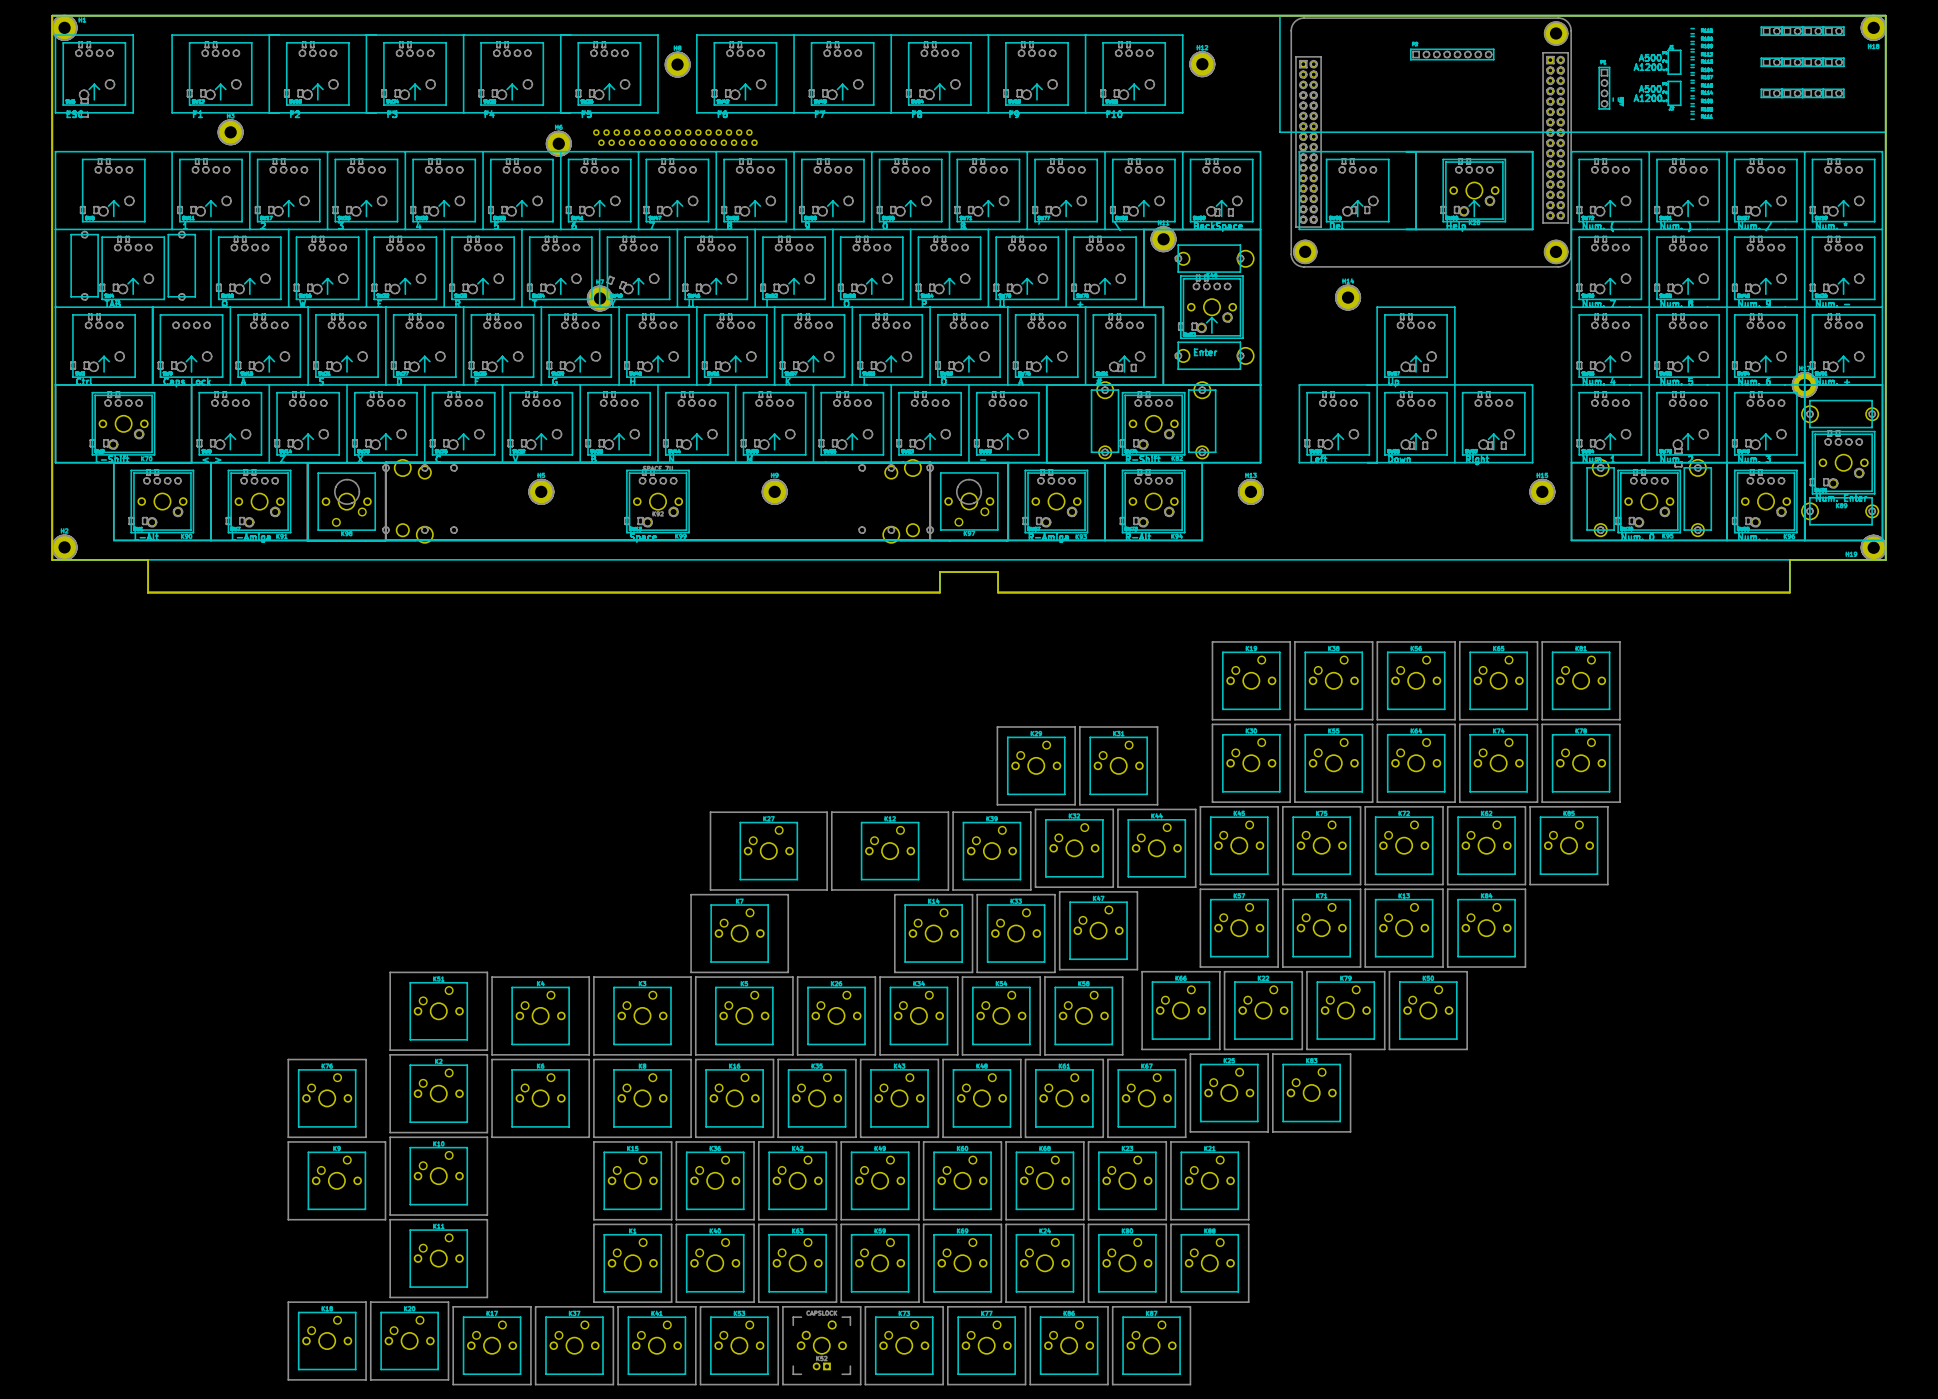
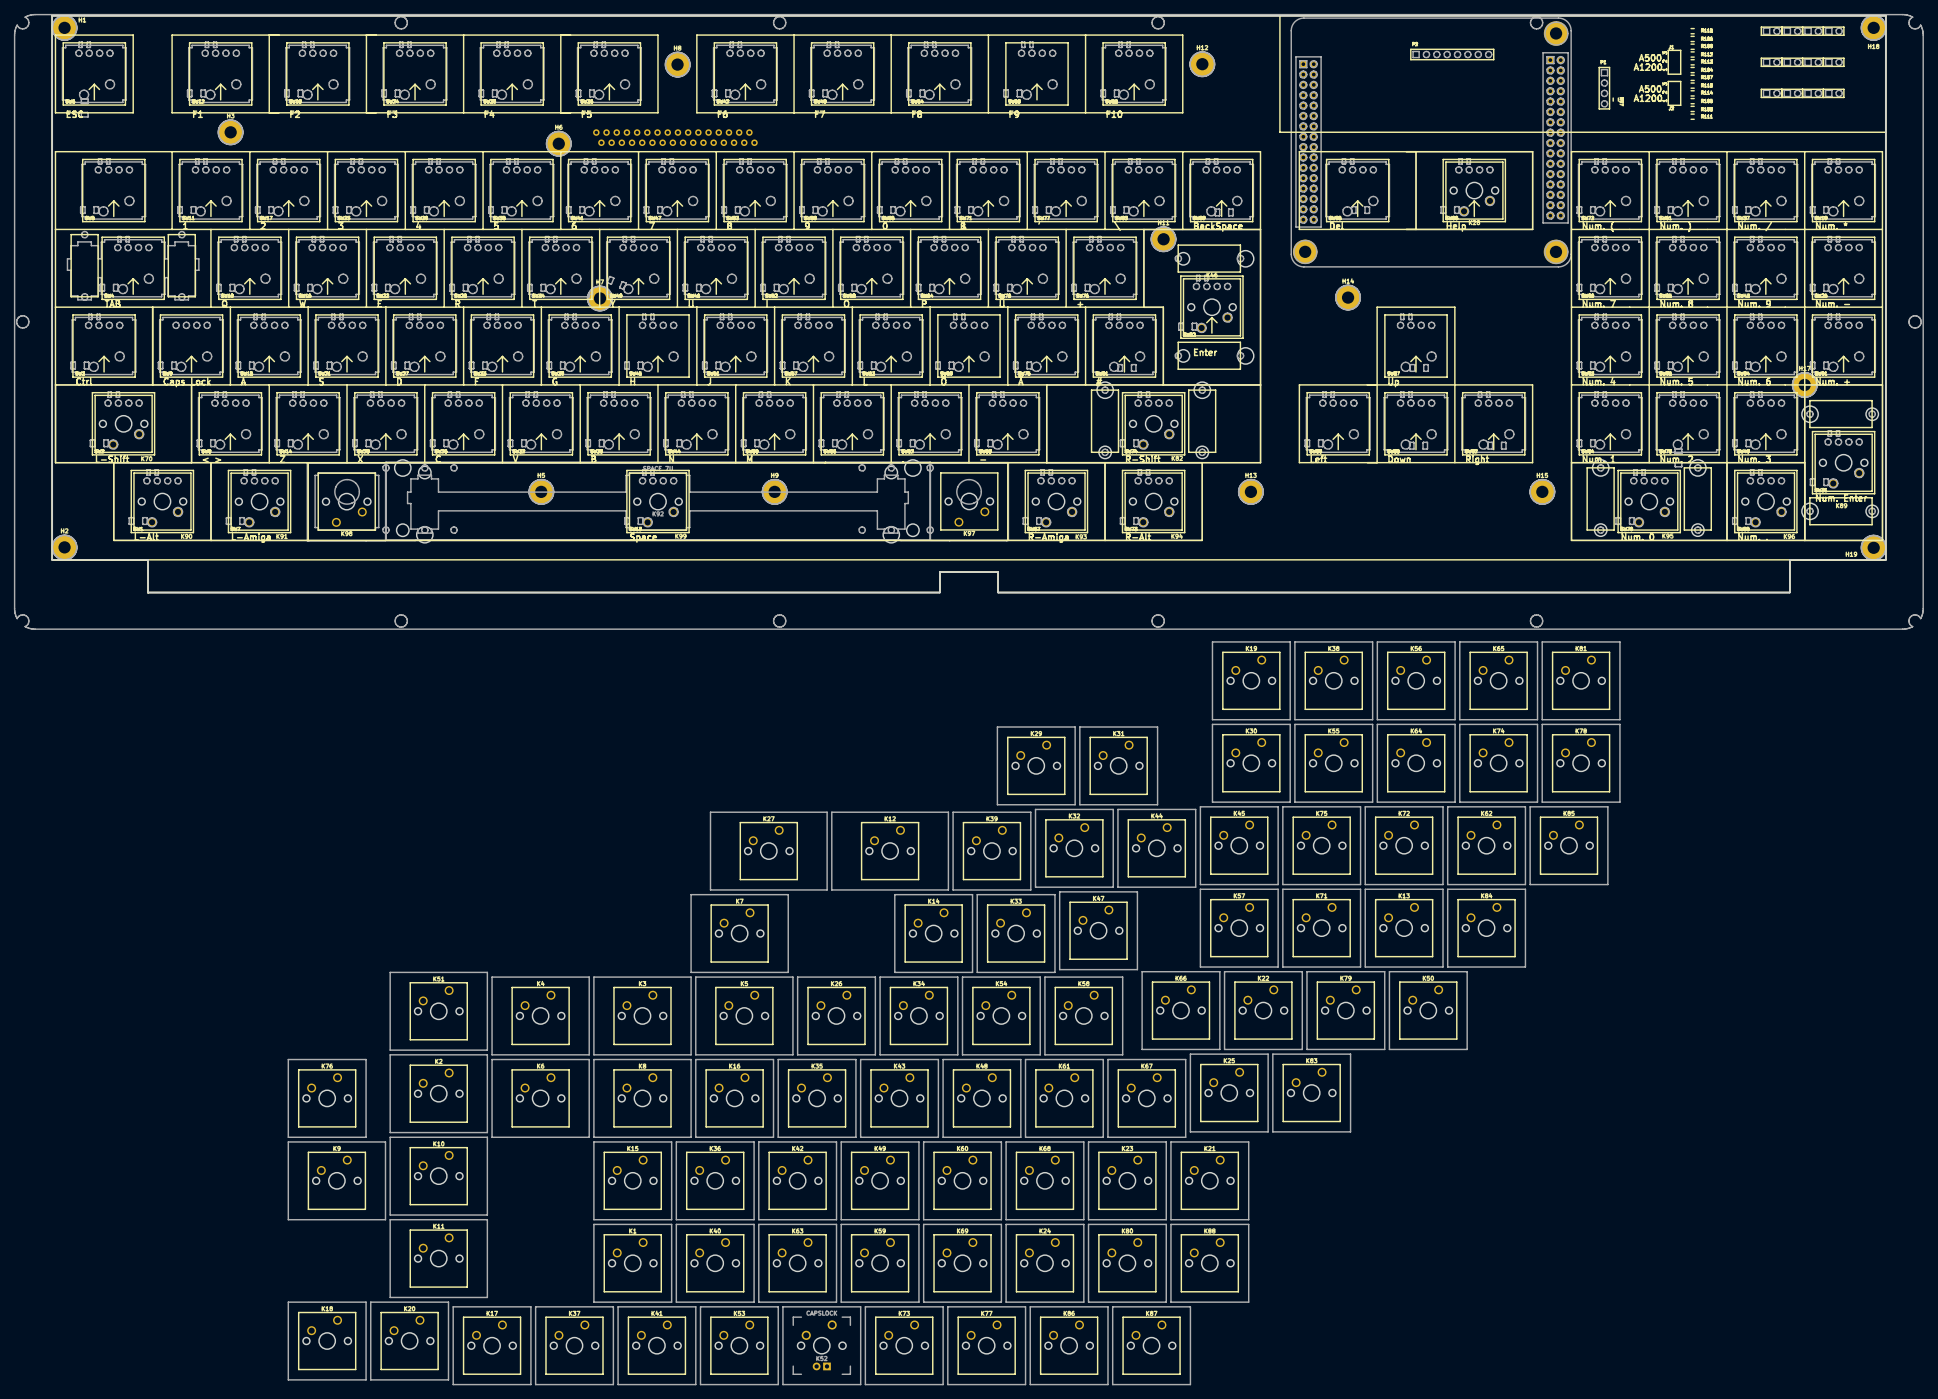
line: none -> (35, 14) (1909, 15) (1912, 17) (1909, 20) (1910, 26) (1915, 28) (1920, 25) (1923, 35) (1922, 615) (1920, 618) (1916, 615) (1911, 616) (1908, 621) (1912, 626) (1902, 629) (28, 628) (25, 626) (28, 622) (27, 617) (22, 614) (17, 618) (14, 608) (14, 35) (17, 25) (20, 28) (26, 27) (28, 22) (25, 17) (35, 14)
line: none -> (401, 16) (396, 19) (395, 22) (397, 27) (401, 28) (404, 27) (407, 22) (406, 19) (401, 16)
line: none -> (779, 16) (783, 17) (785, 22) (783, 27) (779, 28) (776, 27) (773, 22) (776, 17) (779, 16)
line: none -> (1158, 16) (1161, 17) (1164, 22) (1161, 27) (1158, 28) (1154, 27) (1152, 22) (1154, 17) (1158, 16)
line: none -> (1536, 16) (1540, 17) (1542, 22) (1540, 27) (1536, 28) (1531, 26) (1530, 22) (1531, 19) (1536, 16)
line: none -> (65, 45) (122, 45) (122, 47) (126, 47) (126, 100) (122, 100) (122, 102) (65, 102) (65, 100) (62, 100) (62, 47) (65, 47) (65, 45)
line: none -> (192, 45) (249, 45) (249, 47) (252, 47) (252, 100) (249, 100) (249, 102) (192, 102) (192, 100) (188, 100) (188, 47) (192, 47) (192, 45)
line: none -> (289, 45) (346, 45) (346, 47) (349, 47) (349, 100) (346, 100) (346, 102) (289, 102) (289, 100) (285, 100) (285, 47) (289, 47) (289, 45)
line: none -> (386, 45) (443, 45) (443, 47) (446, 47) (446, 100) (443, 100) (443, 102) (386, 102) (386, 100) (383, 100) (383, 47) (386, 47) (386, 45)
line: none -> (483, 45) (483, 47) (480, 47) (480, 100) (483, 100) (483, 102) (540, 102) (540, 100) (543, 100) (543, 47) (540, 47) (540, 45) (483, 45)
line: none -> (580, 45) (637, 45) (637, 47) (641, 47) (641, 100) (637, 100) (637, 102) (580, 102) (580, 100) (577, 100) (577, 47) (580, 47) (580, 45)
line: none -> (716, 45) (773, 45) (773, 47) (777, 47) (777, 100) (773, 100) (773, 102) (716, 102) (716, 100) (713, 100) (713, 47) (716, 47) (716, 45)
line: none -> (814, 45) (814, 47) (810, 47) (810, 100) (814, 100) (814, 102) (871, 102) (871, 100) (874, 100) (874, 47) (871, 47) (871, 45) (814, 45)
line: none -> (911, 45) (911, 47) (907, 47) (907, 100) (911, 100) (911, 102) (968, 102) (968, 100) (971, 100) (971, 47) (968, 47) (968, 45) (911, 45)
line: none -> (1105, 45) (1162, 45) (1162, 47) (1165, 47) (1165, 100) (1162, 100) (1162, 102) (1105, 102) (1105, 100) (1102, 100) (1102, 47) (1105, 47) (1105, 45)
line: none -> (85, 161) (142, 161) (142, 164) (145, 164) (145, 216) (142, 216) (142, 219) (85, 219) (85, 216) (81, 216) (81, 164) (85, 164) (85, 161)
line: none -> (182, 161) (239, 161) (239, 164) (242, 164) (242, 216) (239, 216) (239, 219) (182, 219) (182, 216) (179, 216) (179, 164) (182, 164) (182, 161)
line: none -> (260, 161) (317, 161) (317, 164) (320, 164) (320, 216) (317, 216) (317, 219) (260, 219) (260, 216) (256, 216) (256, 164) (260, 164) (260, 161)
line: none -> (337, 161) (394, 161) (394, 164) (398, 164) (398, 216) (394, 216) (394, 219) (337, 219) (337, 216) (334, 216) (334, 164) (337, 164) (337, 161)
line: none -> (415, 161) (472, 161) (472, 164) (475, 164) (475, 216) (472, 216) (472, 219) (415, 219) (415, 216) (412, 216) (412, 164) (415, 164) (415, 161)
line: none -> (493, 161) (550, 161) (550, 164) (553, 164) (553, 216) (550, 216) (550, 219) (493, 219) (493, 216) (490, 216) (490, 164) (493, 164) (493, 161)
line: none -> (571, 161) (628, 161) (628, 164) (631, 164) (631, 216) (628, 216) (628, 219) (571, 219) (571, 216) (567, 216) (567, 164) (571, 164) (571, 161)
line: none -> (648, 161) (705, 161) (705, 164) (709, 164) (709, 216) (705, 216) (705, 219) (648, 219) (648, 216) (645, 216) (645, 164) (648, 164) (648, 161)
line: none -> (726, 161) (783, 161) (783, 164) (786, 164) (786, 216) (783, 216) (783, 219) (726, 219) (726, 216) (723, 216) (723, 164) (726, 164) (726, 161)
line: none -> (804, 161) (861, 161) (861, 164) (864, 164) (864, 216) (861, 216) (861, 219) (804, 219) (804, 216) (801, 216) (801, 164) (804, 164) (804, 161)
line: none -> (882, 161) (939, 161) (939, 164) (942, 164) (942, 216) (939, 216) (939, 219) (882, 219) (882, 216) (878, 216) (878, 164) (882, 164) (882, 161)
line: none -> (959, 161) (1016, 161) (1016, 164) (1020, 164) (1020, 216) (1016, 216) (1016, 219) (959, 219) (959, 216) (956, 216) (956, 164) (959, 164) (959, 161)
line: none -> (1037, 161) (1037, 164) (1034, 164) (1034, 216) (1037, 216) (1037, 219) (1094, 219) (1094, 216) (1097, 216) (1097, 164) (1094, 164) (1094, 161) (1037, 161)
line: none -> (1115, 161) (1172, 161) (1172, 164) (1175, 164) (1175, 216) (1172, 216) (1172, 219) (1115, 219) (1115, 216) (1112, 216) (1112, 164) (1115, 164) (1115, 161)
line: none -> (1193, 161) (1250, 161) (1250, 164) (1253, 164) (1253, 216) (1250, 216) (1250, 219) (1193, 219) (1193, 216) (1189, 216) (1189, 164) (1193, 164) (1193, 161)
line: none -> (1329, 161) (1386, 161) (1386, 164) (1389, 164) (1389, 216) (1386, 216) (1386, 219) (1329, 219) (1329, 216) (1325, 216) (1325, 164) (1329, 164) (1329, 161)
line: none -> (1581, 161) (1638, 161) (1638, 164) (1642, 164) (1642, 216) (1638, 216) (1638, 219) (1581, 219) (1581, 216) (1578, 216) (1578, 164) (1581, 164) (1581, 161)
line: none -> (1659, 161) (1716, 161) (1716, 164) (1719, 164) (1719, 216) (1716, 216) (1716, 219) (1659, 219) (1659, 216) (1656, 216) (1656, 164) (1659, 164) (1659, 161)
line: none -> (1737, 161) (1794, 161) (1794, 164) (1797, 164) (1797, 216) (1794, 216) (1794, 219) (1737, 219) (1737, 216) (1733, 216) (1733, 164) (1737, 164) (1737, 161)
line: none -> (1814, 161) (1872, 161) (1872, 164) (1875, 164) (1875, 216) (1872, 216) (1872, 219) (1814, 219) (1814, 216) (1811, 216) (1811, 164) (1814, 164) (1814, 161)
line: none -> (104, 239) (104, 242) (101, 242) (101, 258) (98, 258) (98, 245) (91, 245) (91, 241) (77, 241) (77, 245) (70, 245) (70, 258) (67, 258) (67, 270) (70, 270) (70, 295) (77, 295) (77, 299) (91, 299) (91, 295) (98, 295) (98, 277) (101, 277) (101, 294) (104, 294) (104, 296) (161, 296) (161, 294) (164, 294) (164, 277) (167, 277) (167, 295) (174, 295) (174, 299) (188, 299) (188, 295) (195, 295) (195, 270) (198, 270) (198, 258) (195, 258) (195, 245) (188, 245) (188, 241) (174, 241) (174, 245) (167, 245) (167, 258) (164, 258) (164, 242) (161, 242) (161, 239) (104, 239)
line: none -> (221, 239) (221, 242) (217, 242) (217, 294) (221, 294) (221, 296) (278, 296) (278, 294) (281, 294) (281, 242) (278, 242) (278, 239) (221, 239)
line: none -> (298, 239) (356, 239) (356, 242) (359, 242) (359, 294) (356, 294) (356, 296) (298, 296) (298, 294) (295, 294) (295, 242) (298, 242) (298, 239)
line: none -> (376, 239) (433, 239) (433, 242) (437, 242) (437, 294) (433, 294) (433, 296) (376, 296) (376, 294) (373, 294) (373, 242) (376, 242) (376, 239)
line: none -> (454, 239) (511, 239) (511, 242) (514, 242) (514, 294) (511, 294) (511, 296) (454, 296) (454, 294) (451, 294) (451, 242) (454, 242) (454, 239)
line: none -> (532, 239) (589, 239) (589, 242) (592, 242) (592, 294) (589, 294) (589, 296) (532, 296) (532, 294) (528, 294) (528, 242) (532, 242) (532, 239)
line: none -> (609, 239) (667, 239) (667, 242) (670, 242) (670, 294) (667, 294) (667, 296) (609, 296) (609, 294) (606, 294) (606, 242) (609, 242) (609, 239)
line: none -> (687, 239) (687, 242) (684, 242) (684, 294) (687, 294) (687, 296) (744, 296) (744, 294) (748, 294) (748, 242) (744, 242) (744, 239) (687, 239)
line: none -> (765, 239) (765, 242) (762, 242) (762, 294) (765, 294) (765, 296) (822, 296) (822, 294) (825, 294) (825, 242) (822, 242) (822, 239) (765, 239)
line: none -> (843, 239) (843, 242) (839, 242) (839, 294) (843, 294) (843, 296) (900, 296) (900, 294) (903, 294) (903, 242) (900, 242) (900, 239) (843, 239)
line: none -> (920, 239) (978, 239) (978, 242) (981, 242) (981, 294) (978, 294) (978, 296) (920, 296) (920, 294) (917, 294) (917, 242) (920, 242) (920, 239)
line: none -> (998, 239) (998, 242) (995, 242) (995, 294) (998, 294) (998, 296) (1055, 296) (1055, 294) (1059, 294) (1059, 242) (1055, 242) (1055, 239) (998, 239)
line: none -> (1076, 239) (1133, 239) (1133, 242) (1136, 242) (1136, 294) (1133, 294) (1133, 296) (1076, 296) (1076, 294) (1073, 294) (1073, 242) (1076, 242) (1076, 239)
line: none -> (1581, 239) (1638, 239) (1638, 242) (1642, 242) (1642, 294) (1638, 294) (1638, 296) (1581, 296) (1581, 294) (1578, 294) (1578, 242) (1581, 242) (1581, 239)
line: none -> (1659, 239) (1659, 242) (1656, 242) (1656, 294) (1659, 294) (1659, 296) (1716, 296) (1716, 294) (1719, 294) (1719, 242) (1716, 242) (1716, 239) (1659, 239)
line: none -> (1737, 239) (1737, 242) (1733, 242) (1733, 294) (1737, 294) (1737, 296) (1794, 296) (1794, 294) (1797, 294) (1797, 242) (1794, 242) (1794, 239) (1737, 239)
line: none -> (1814, 239) (1814, 242) (1811, 242) (1811, 294) (1814, 294) (1814, 296) (1872, 296) (1872, 294) (1875, 294) (1875, 242) (1872, 242) (1872, 239) (1814, 239)
line: none -> (22, 315) (19, 316) (16, 321) (19, 326) (22, 328) (27, 325) (28, 321) (27, 318) (22, 315)
line: none -> (1915, 315) (1911, 316) (1908, 321) (1911, 326) (1915, 328) (1919, 325) (1921, 321) (1919, 318) (1915, 315)
line: none -> (75, 317) (132, 317) (132, 319) (135, 319) (135, 372) (132, 372) (132, 374) (75, 374) (75, 372) (72, 372) (72, 319) (75, 319) (75, 317)
line: none -> (162, 317) (220, 317) (220, 319) (223, 319) (223, 372) (220, 372) (220, 374) (162, 374) (162, 372) (159, 372) (159, 319) (162, 319) (162, 317)
line: none -> (240, 317) (240, 319) (237, 319) (237, 372) (240, 372) (240, 374) (297, 374) (297, 372) (301, 372) (301, 319) (297, 319) (297, 317) (240, 317)
line: none -> (318, 317) (318, 319) (315, 319) (315, 372) (318, 372) (318, 374) (375, 374) (375, 372) (378, 372) (378, 319) (375, 319) (375, 317) (318, 317)
line: none -> (396, 317) (453, 317) (453, 319) (456, 319) (456, 372) (453, 372) (453, 374) (396, 374) (396, 372) (392, 372) (392, 319) (396, 319) (396, 317)
line: none -> (473, 317) (531, 317) (531, 319) (534, 319) (534, 372) (531, 372) (531, 374) (473, 374) (473, 372) (470, 372) (470, 319) (473, 319) (473, 317)
line: none -> (551, 317) (608, 317) (608, 319) (612, 319) (612, 372) (608, 372) (608, 374) (551, 374) (551, 372) (548, 372) (548, 319) (551, 319) (551, 317)
line: none -> (707, 317) (764, 317) (764, 319) (767, 319) (767, 372) (764, 372) (764, 374) (707, 374) (707, 372) (703, 372) (703, 319) (707, 319) (707, 317)
line: none -> (784, 317) (841, 317) (841, 319) (845, 319) (845, 372) (841, 372) (841, 374) (784, 374) (784, 372) (781, 372) (781, 319) (784, 319) (784, 317)
line: none -> (862, 317) (919, 317) (919, 319) (923, 319) (923, 372) (919, 372) (919, 374) (862, 374) (862, 372) (859, 372) (859, 319) (862, 319) (862, 317)
line: none -> (1018, 317) (1075, 317) (1075, 319) (1078, 319) (1078, 372) (1075, 372) (1075, 374) (1018, 374) (1018, 372) (1014, 372) (1014, 319) (1018, 319) (1018, 317)
line: none -> (1095, 317) (1152, 317) (1152, 319) (1156, 319) (1156, 372) (1152, 372) (1152, 374) (1095, 374) (1095, 372) (1092, 372) (1092, 319) (1095, 319) (1095, 317)
line: none -> (1581, 317) (1638, 317) (1638, 319) (1642, 319) (1642, 372) (1638, 372) (1638, 374) (1581, 374) (1581, 372) (1578, 372) (1578, 319) (1581, 319) (1581, 317)
line: none -> (1659, 317) (1716, 317) (1716, 319) (1719, 319) (1719, 372) (1716, 372) (1716, 374) (1659, 374) (1659, 372) (1656, 372) (1656, 319) (1659, 319) (1659, 317)
line: none -> (1737, 317) (1794, 317) (1794, 319) (1797, 319) (1797, 372) (1794, 372) (1794, 374) (1737, 374) (1737, 372) (1733, 372) (1733, 319) (1737, 319) (1737, 317)
line: none -> (1814, 317) (1872, 317) (1872, 319) (1875, 319) (1875, 372) (1872, 372) (1872, 374) (1814, 374) (1814, 372) (1811, 372) (1811, 319) (1814, 319) (1814, 317)
line: none -> (201, 395) (258, 395) (258, 397) (262, 397) (262, 449) (258, 449) (258, 452) (201, 452) (201, 449) (198, 449) (198, 397) (201, 397) (201, 395)
line: none -> (279, 395) (336, 395) (336, 397) (339, 397) (339, 449) (336, 449) (336, 452) (279, 452) (279, 449) (276, 449) (276, 397) (279, 397) (279, 395)
line: none -> (357, 395) (414, 395) (414, 397) (417, 397) (417, 449) (414, 449) (414, 452) (357, 452) (357, 449) (353, 449) (353, 397) (357, 397) (357, 395)
line: none -> (435, 395) (492, 395) (492, 397) (495, 397) (495, 449) (492, 449) (492, 452) (435, 452) (435, 449) (431, 449) (431, 397) (435, 397) (435, 395)
line: none -> (512, 395) (569, 395) (569, 397) (573, 397) (573, 449) (569, 449) (569, 452) (512, 452) (512, 449) (509, 449) (509, 397) (512, 397) (512, 395)
line: none -> (590, 395) (647, 395) (647, 397) (650, 397) (650, 449) (647, 449) (647, 452) (590, 452) (590, 449) (587, 449) (587, 397) (590, 397) (590, 395)
line: none -> (668, 395) (725, 395) (725, 397) (728, 397) (728, 449) (725, 449) (725, 452) (668, 452) (668, 449) (664, 449) (664, 397) (668, 397) (668, 395)
line: none -> (745, 395) (803, 395) (803, 397) (806, 397) (806, 449) (803, 449) (803, 452) (745, 452) (745, 449) (742, 449) (742, 397) (745, 397) (745, 395)
line: none -> (823, 395) (880, 395) (880, 397) (884, 397) (884, 449) (880, 449) (880, 452) (823, 452) (823, 449) (820, 449) (820, 397) (823, 397) (823, 395)
line: none -> (901, 395) (958, 395) (958, 397) (961, 397) (961, 449) (958, 449) (958, 452) (901, 452) (901, 449) (898, 449) (898, 397) (901, 397) (901, 395)
line: none -> (979, 395) (1036, 395) (1036, 397) (1039, 397) (1039, 449) (1036, 449) (1036, 452) (979, 452) (979, 449) (975, 449) (975, 397) (979, 397) (979, 395)
line: none -> (1309, 395) (1366, 395) (1366, 397) (1370, 397) (1370, 449) (1366, 449) (1366, 452) (1309, 452) (1309, 449) (1306, 449) (1306, 397) (1309, 397) (1309, 395)
line: none -> (1387, 395) (1444, 395) (1444, 397) (1447, 397) (1447, 449) (1444, 449) (1444, 452) (1387, 452) (1387, 449) (1384, 449) (1384, 397) (1387, 397) (1387, 395)
line: none -> (1465, 395) (1522, 395) (1522, 397) (1525, 397) (1525, 449) (1522, 449) (1522, 452) (1465, 452) (1465, 449) (1461, 449) (1461, 397) (1465, 397) (1465, 395)
line: none -> (1581, 395) (1638, 395) (1638, 397) (1642, 397) (1642, 449) (1638, 449) (1638, 452) (1581, 452) (1581, 449) (1578, 449) (1578, 397) (1581, 397) (1581, 395)
line: none -> (1659, 395) (1716, 395) (1716, 397) (1719, 397) (1719, 449) (1716, 449) (1716, 452) (1659, 452) (1659, 449) (1656, 449) (1656, 397) (1659, 397) (1659, 395)
line: none -> (1737, 395) (1794, 395) (1794, 397) (1797, 397) (1797, 449) (1794, 449) (1794, 452) (1737, 452) (1737, 449) (1733, 449) (1733, 397) (1737, 397) (1737, 395)
line: none -> (318, 472) (318, 475) (315, 475) (315, 527) (318, 527) (318, 530) (375, 530) (375, 527) (378, 527) (378, 475) (375, 475) (375, 472) (318, 472)
line: none -> (629, 472) (629, 475) (626, 475) (626, 492) (438, 492) (438, 478) (431, 478) (431, 475) (417, 475) (417, 478) (410, 478) (410, 492) (407, 492) (407, 503) (410, 503) (410, 529) (417, 529) (417, 533) (431, 533) (431, 529) (438, 529) (438, 510) (626, 510) (626, 527) (629, 527) (629, 530) (686, 530) (686, 527) (689, 527) (689, 510) (877, 510) (877, 529) (884, 529) (884, 533) (897, 533) (897, 529) (904, 529) (904, 503) (908, 503) (908, 492) (904, 492) (904, 478) (897, 478) (897, 475) (884, 475) (884, 478) (877, 478) (877, 492) (689, 492) (689, 475) (686, 475) (686, 472) (629, 472)
line: none -> (401, 614) (406, 617) (407, 621) (404, 625) (401, 627) (397, 625) (395, 621) (396, 617) (401, 614)
line: none -> (779, 614) (776, 616) (773, 621) (776, 625) (779, 627) (783, 625) (785, 621) (783, 616) (779, 614)
line: none -> (1158, 614) (1161, 616) (1164, 621) (1161, 625) (1158, 627) (1154, 625) (1152, 621) (1154, 616) (1158, 614)
line: none -> (1536, 614) (1540, 616) (1542, 621) (1540, 625) (1536, 627) (1531, 624) (1530, 621) (1531, 617) (1536, 614)

